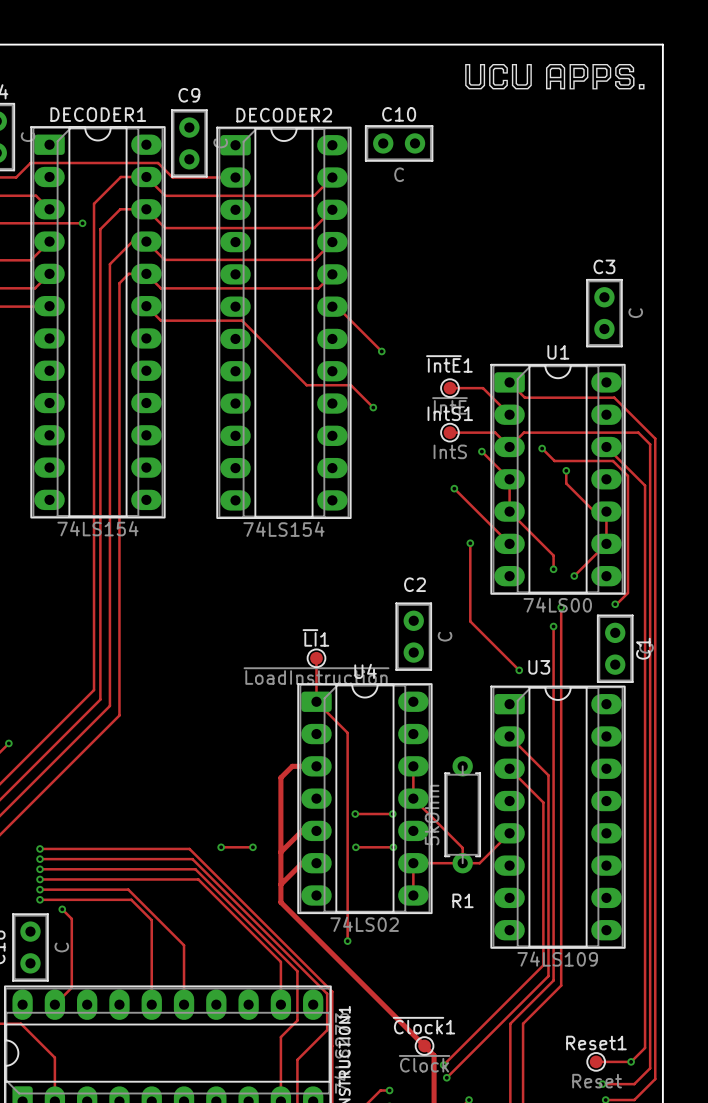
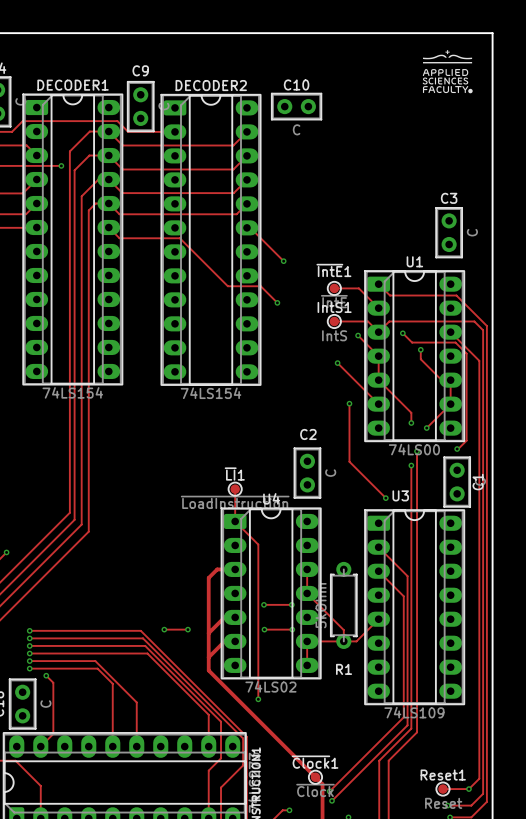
drawing: [465, 63, 645, 90] -> none
drawing: none -> [422, 50, 473, 94]

